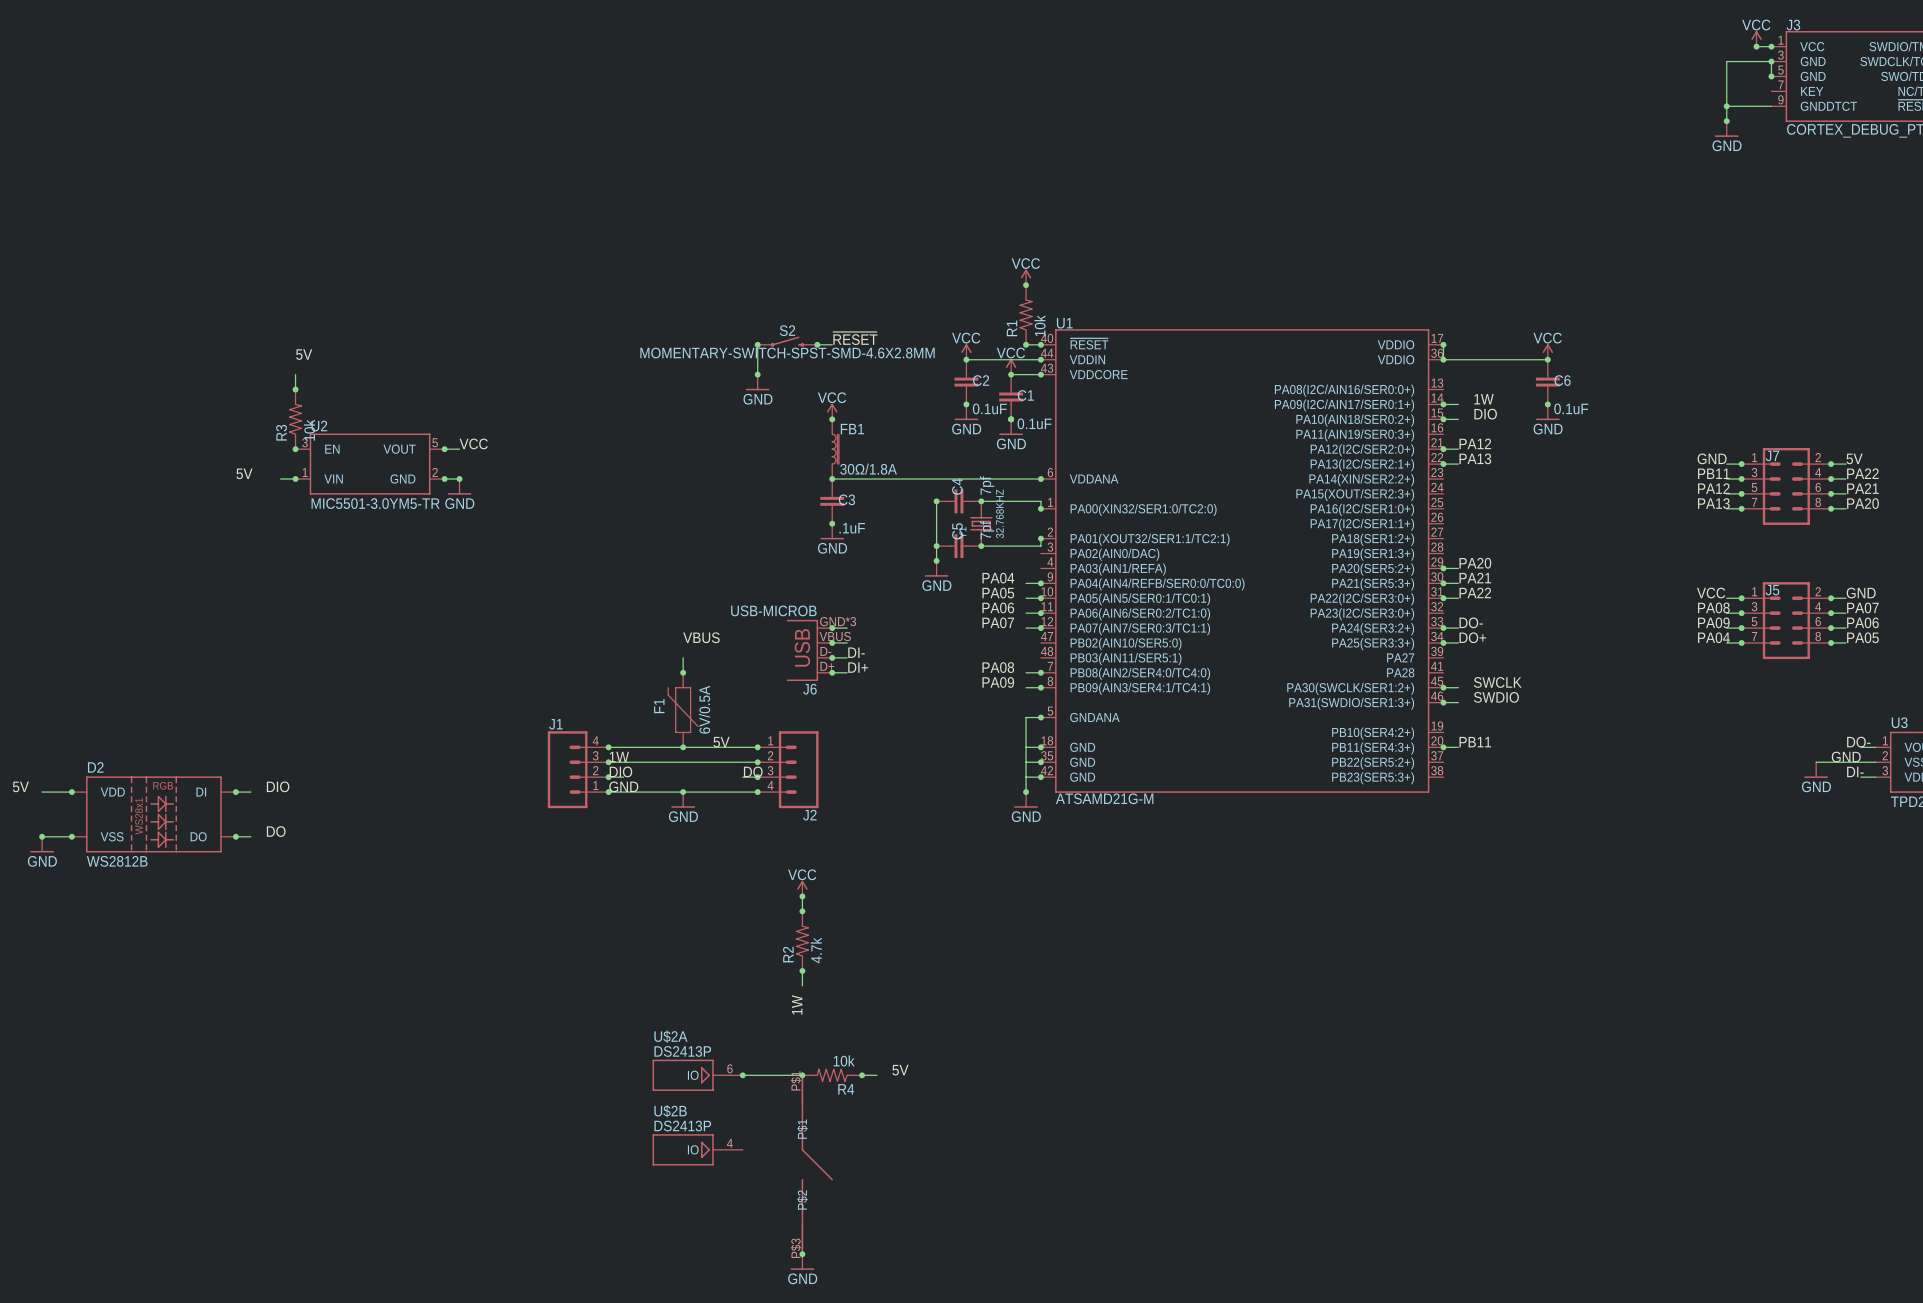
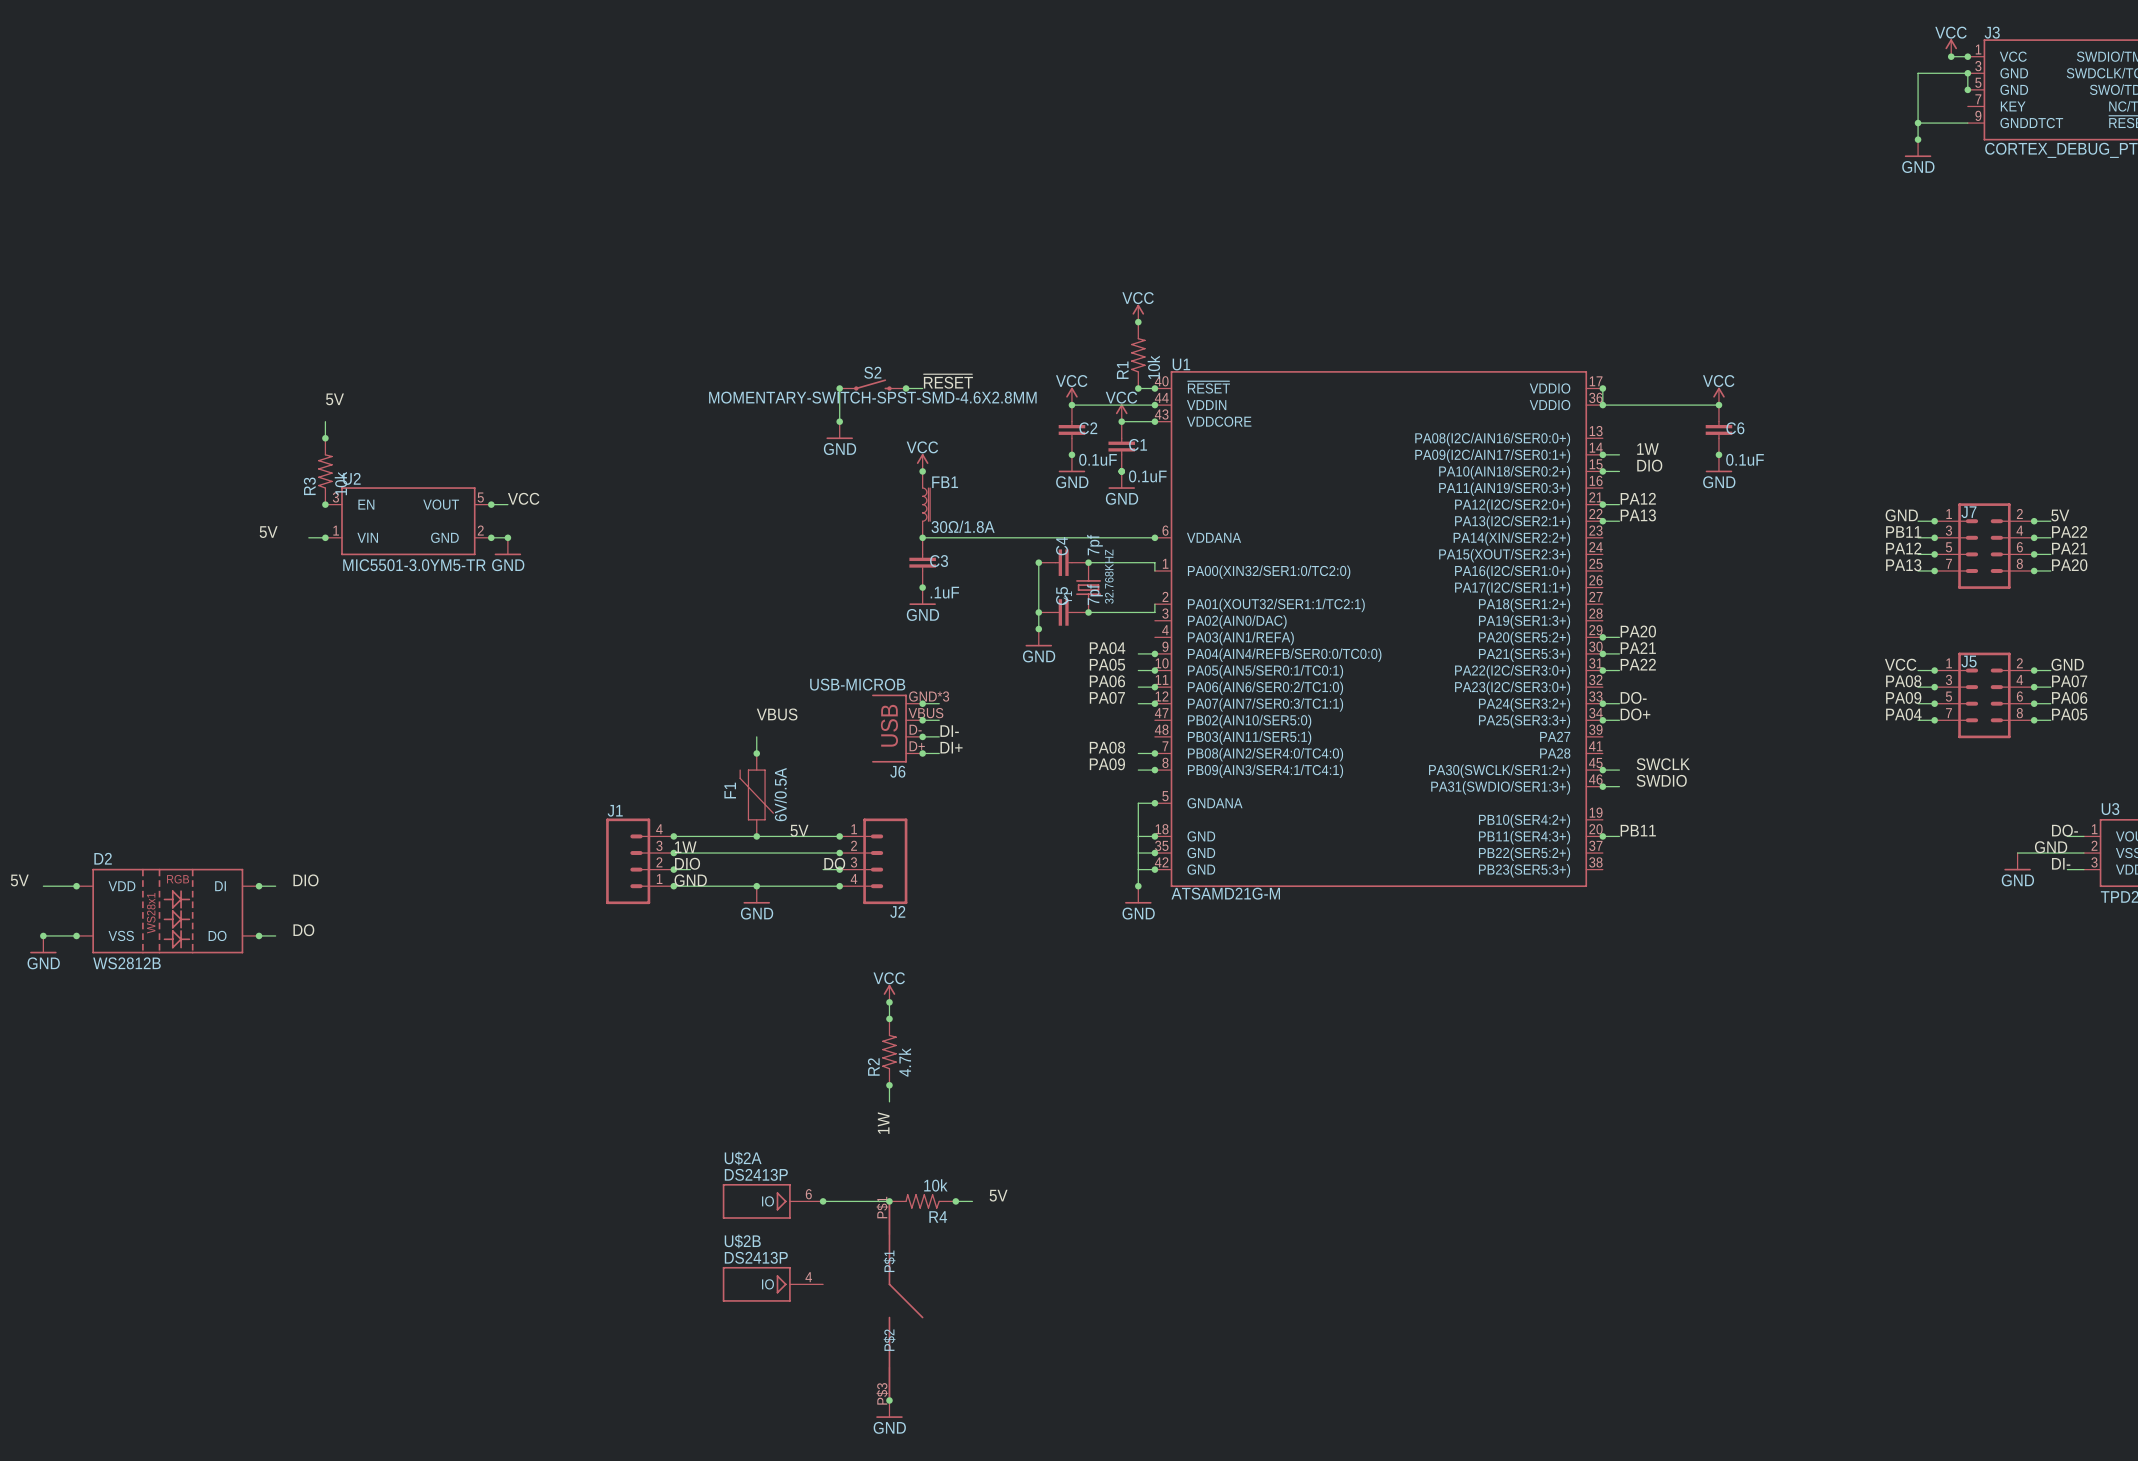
junction: (1040, 508) -> none
junction: (1040, 538) -> none

